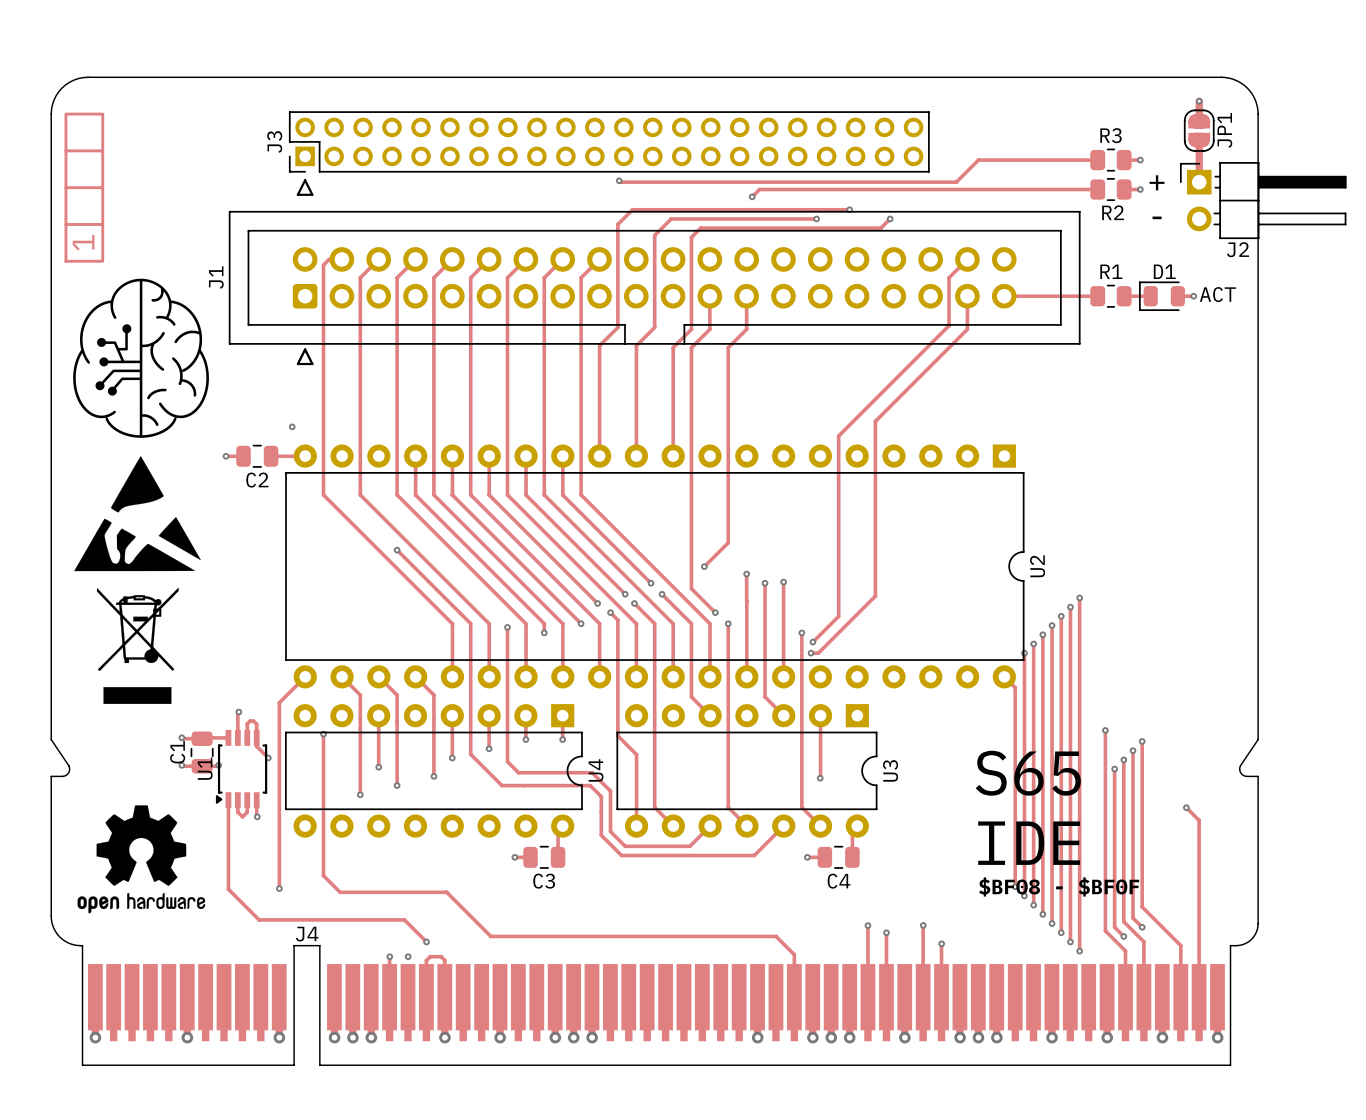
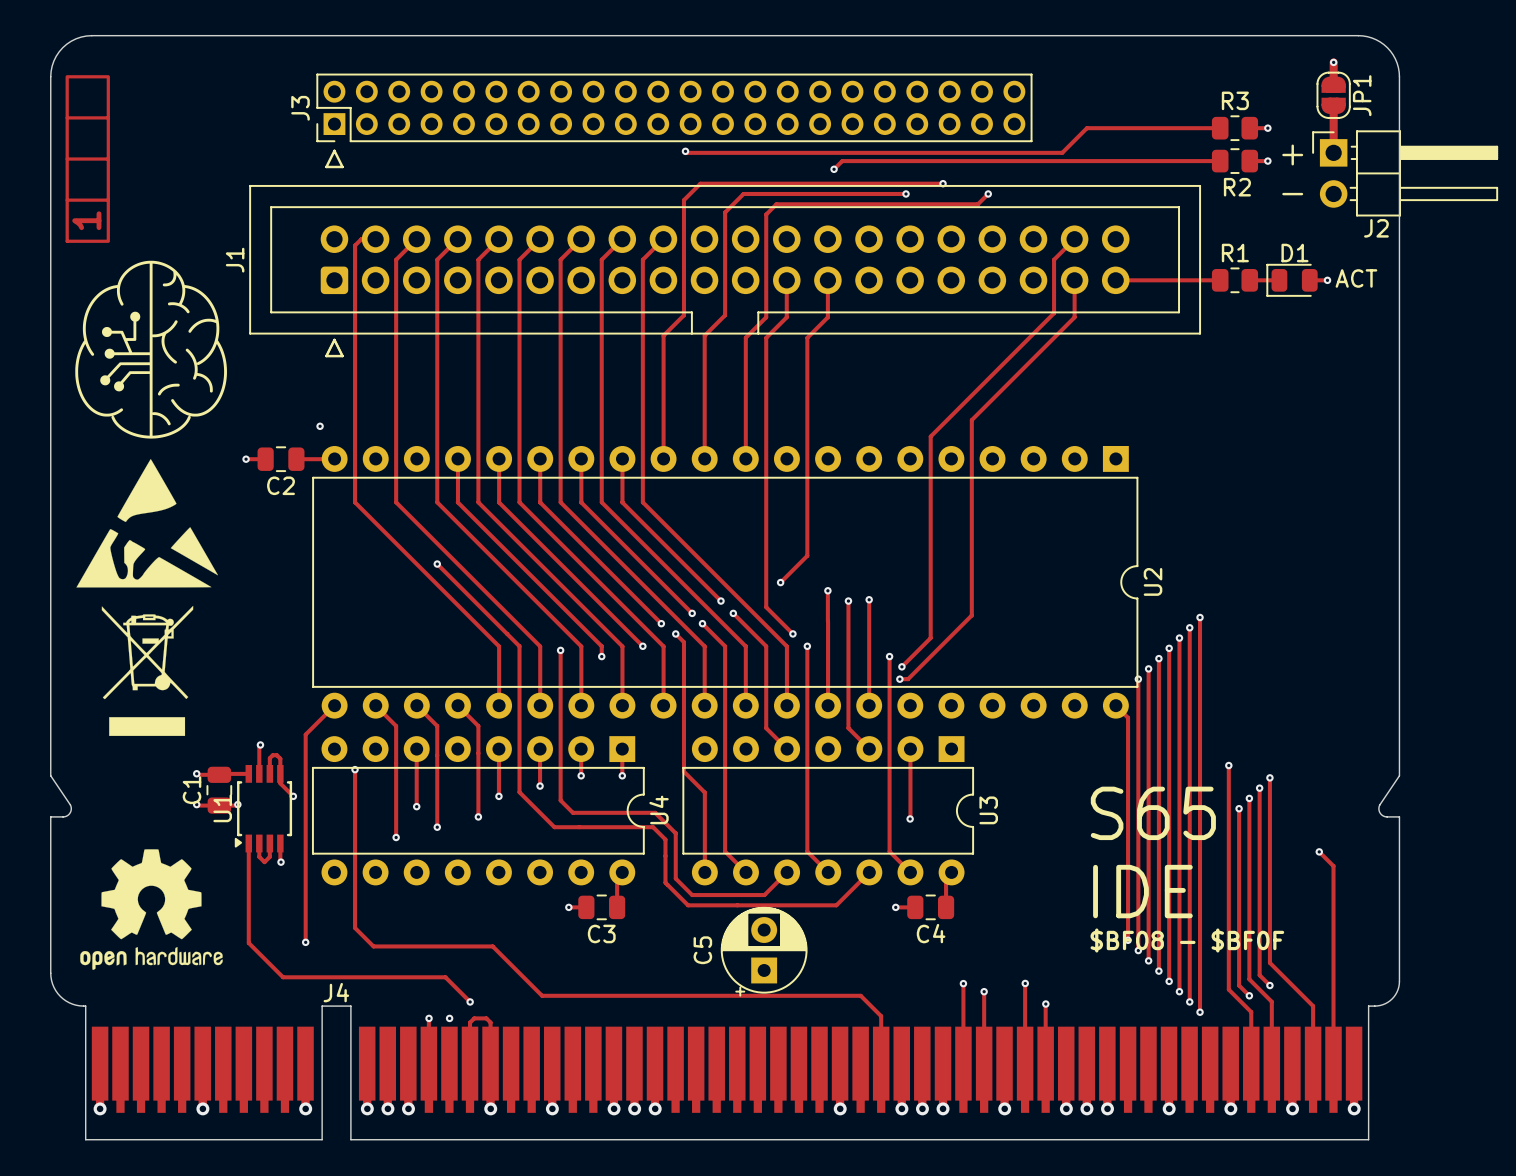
C5: none -> (764, 951)

